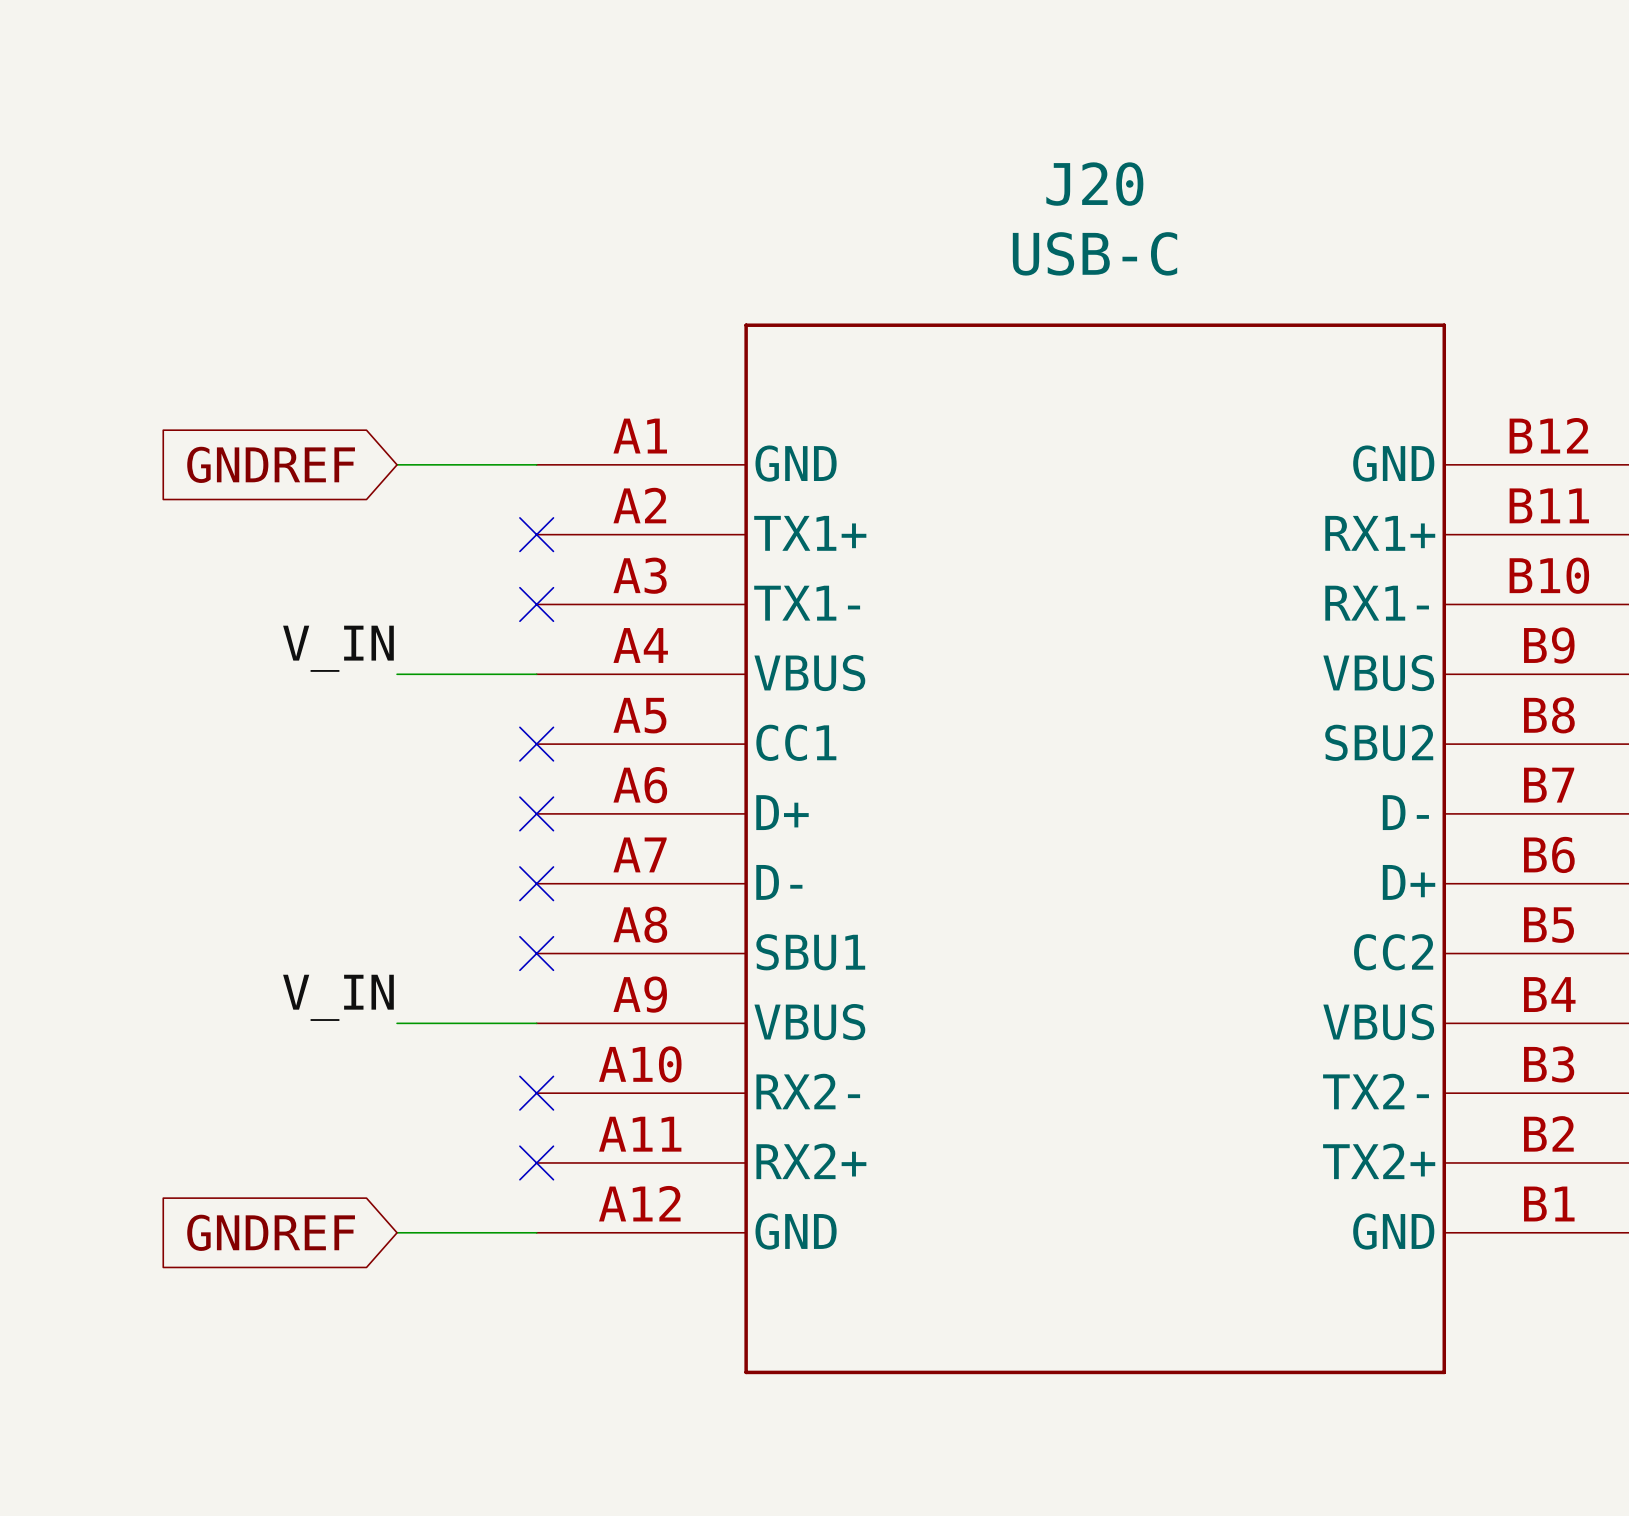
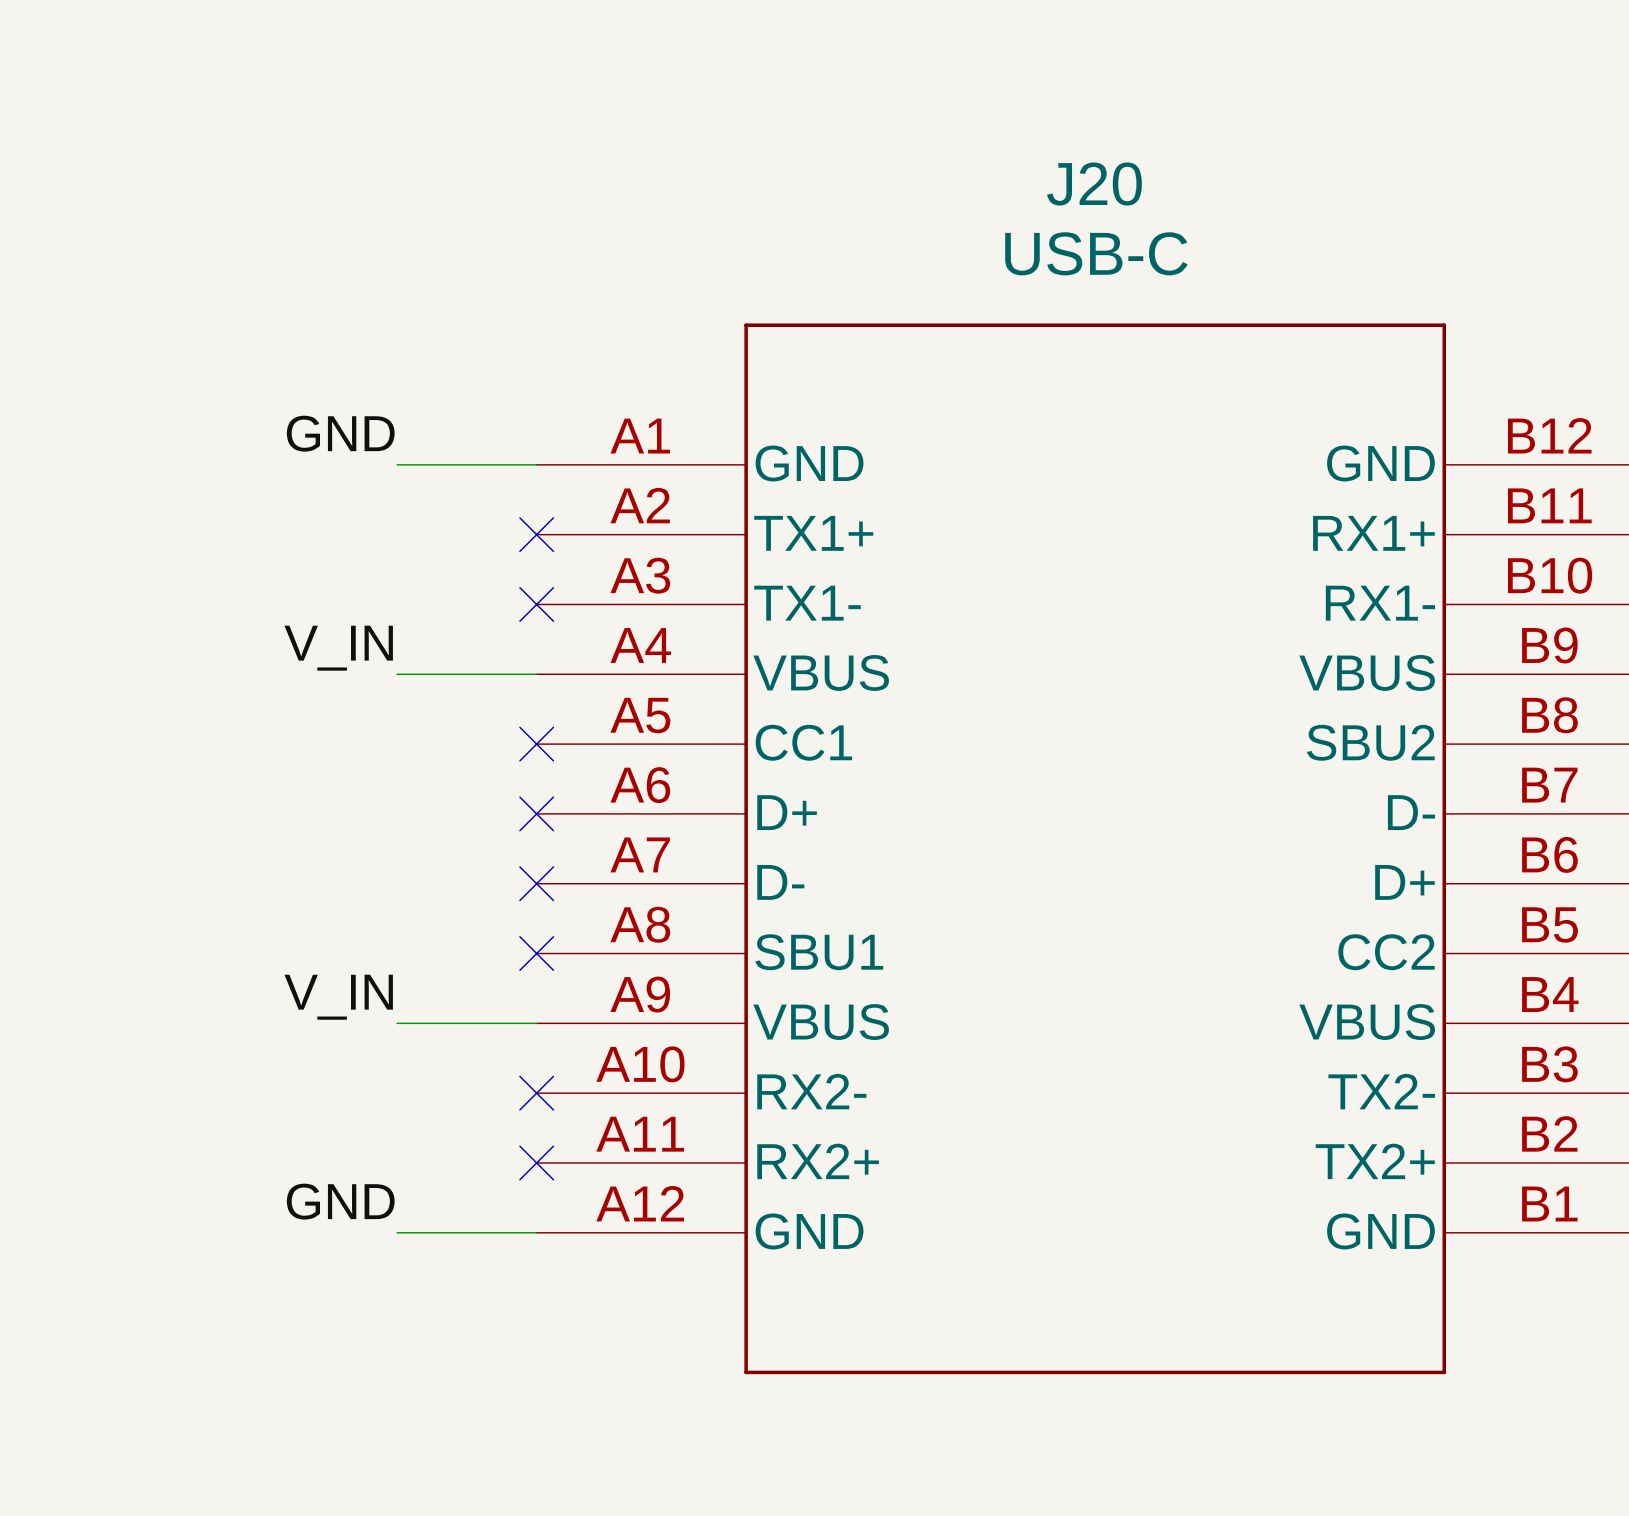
label: none -> GND (340, 433)
global label: GNDREF (271, 464) -> none
label: none -> GND (340, 1201)
global label: GNDREF (271, 1232) -> none

